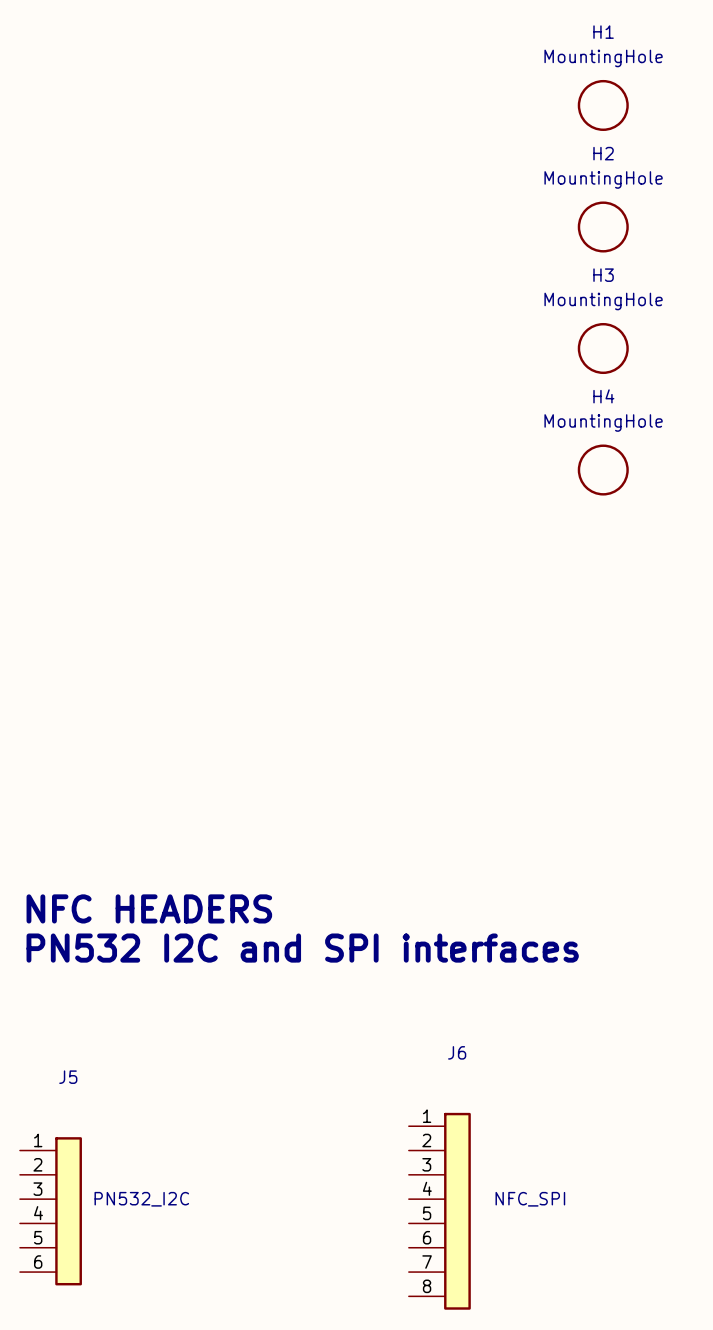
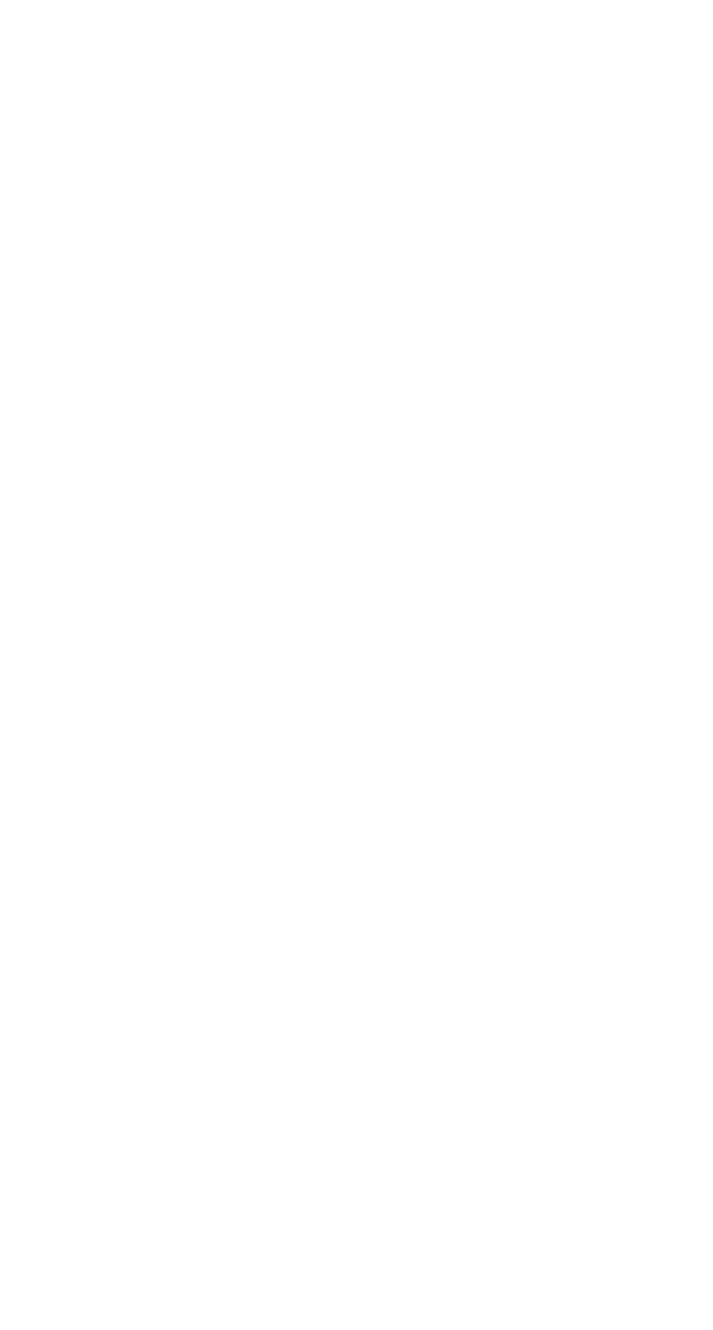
H1: MountingHole (603, 105) -> none
H2: MountingHole (603, 226) -> none
H3: MountingHole (603, 348) -> none
H4: MountingHole (603, 470) -> none
text: NFC HEADERS (149, 908) -> none
text: PN532 I2C and SPI interfaces (302, 948) -> none
J5: PN532_I2C (50, 1211) -> none
J6: NFC_SPI (439, 1211) -> none

